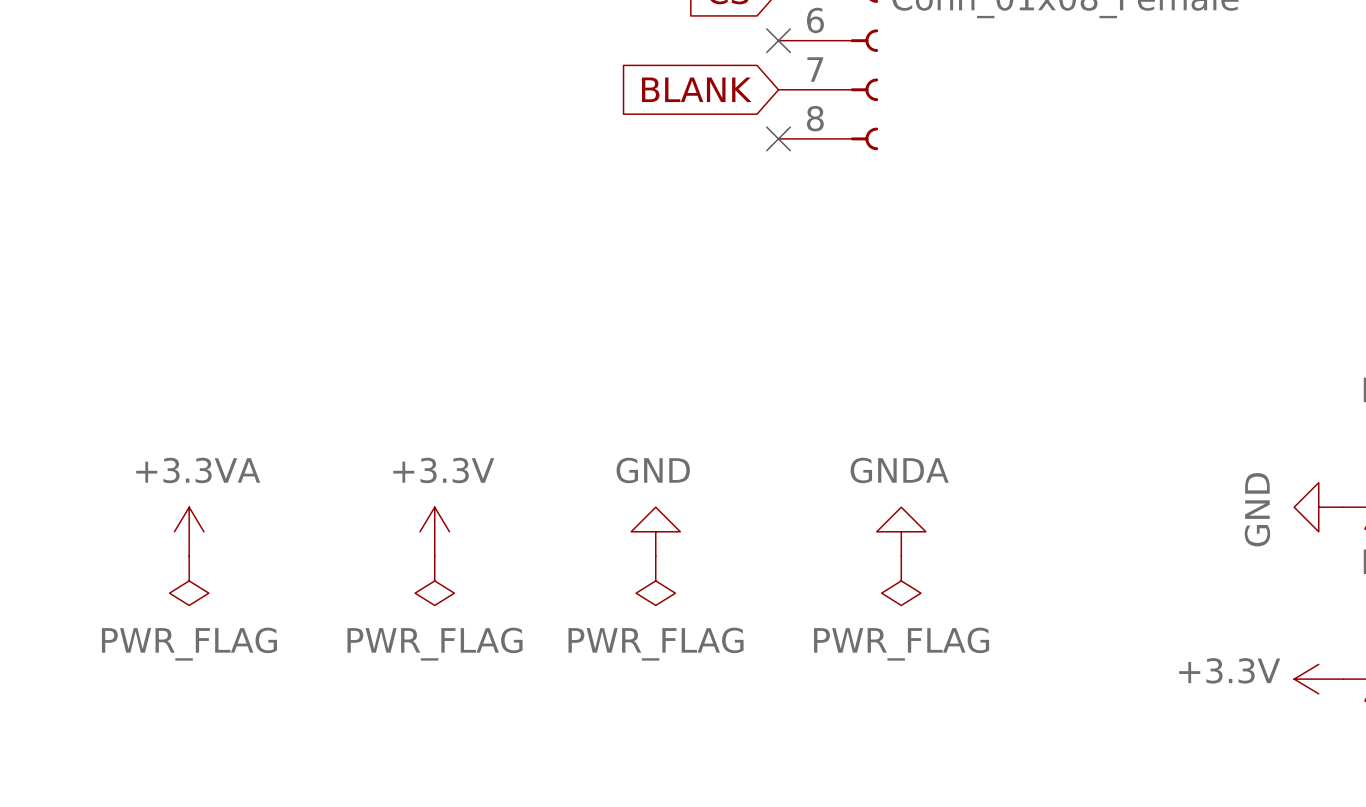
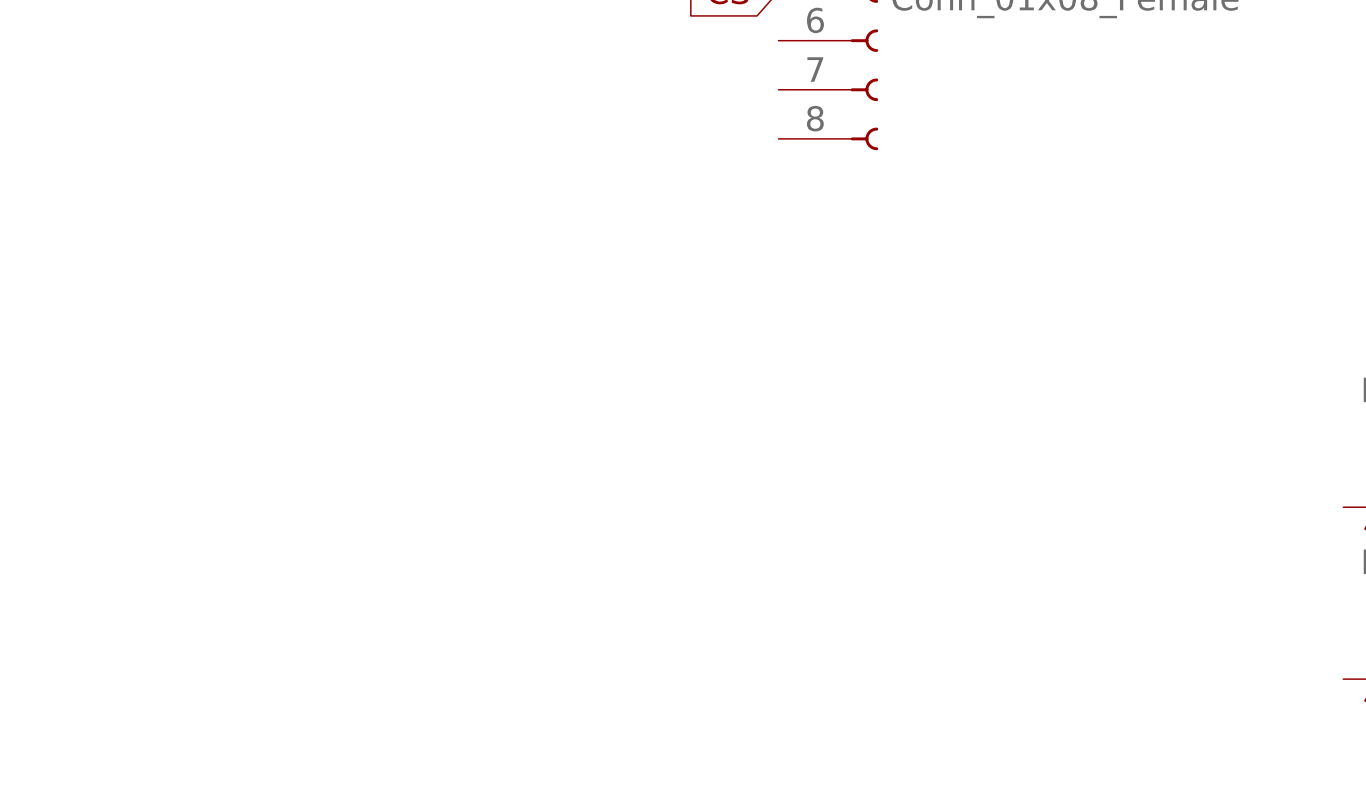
no-connect mark: (778, 40) -> none
global label: BLANK (696, 89) -> none
no-connect mark: (778, 138) -> none
power symbol: GND (1318, 507) -> none
power symbol: +3.3VA (189, 531) -> none
power symbol: +3.3V (434, 531) -> none
power symbol: GND (655, 531) -> none
power symbol: GNDA (901, 531) -> none
power symbol: PWR_FLAG (189, 580) -> none
power symbol: PWR_FLAG (434, 580) -> none
power symbol: PWR_FLAG (655, 580) -> none
power symbol: PWR_FLAG (901, 580) -> none
power symbol: +3.3V (1318, 679) -> none

